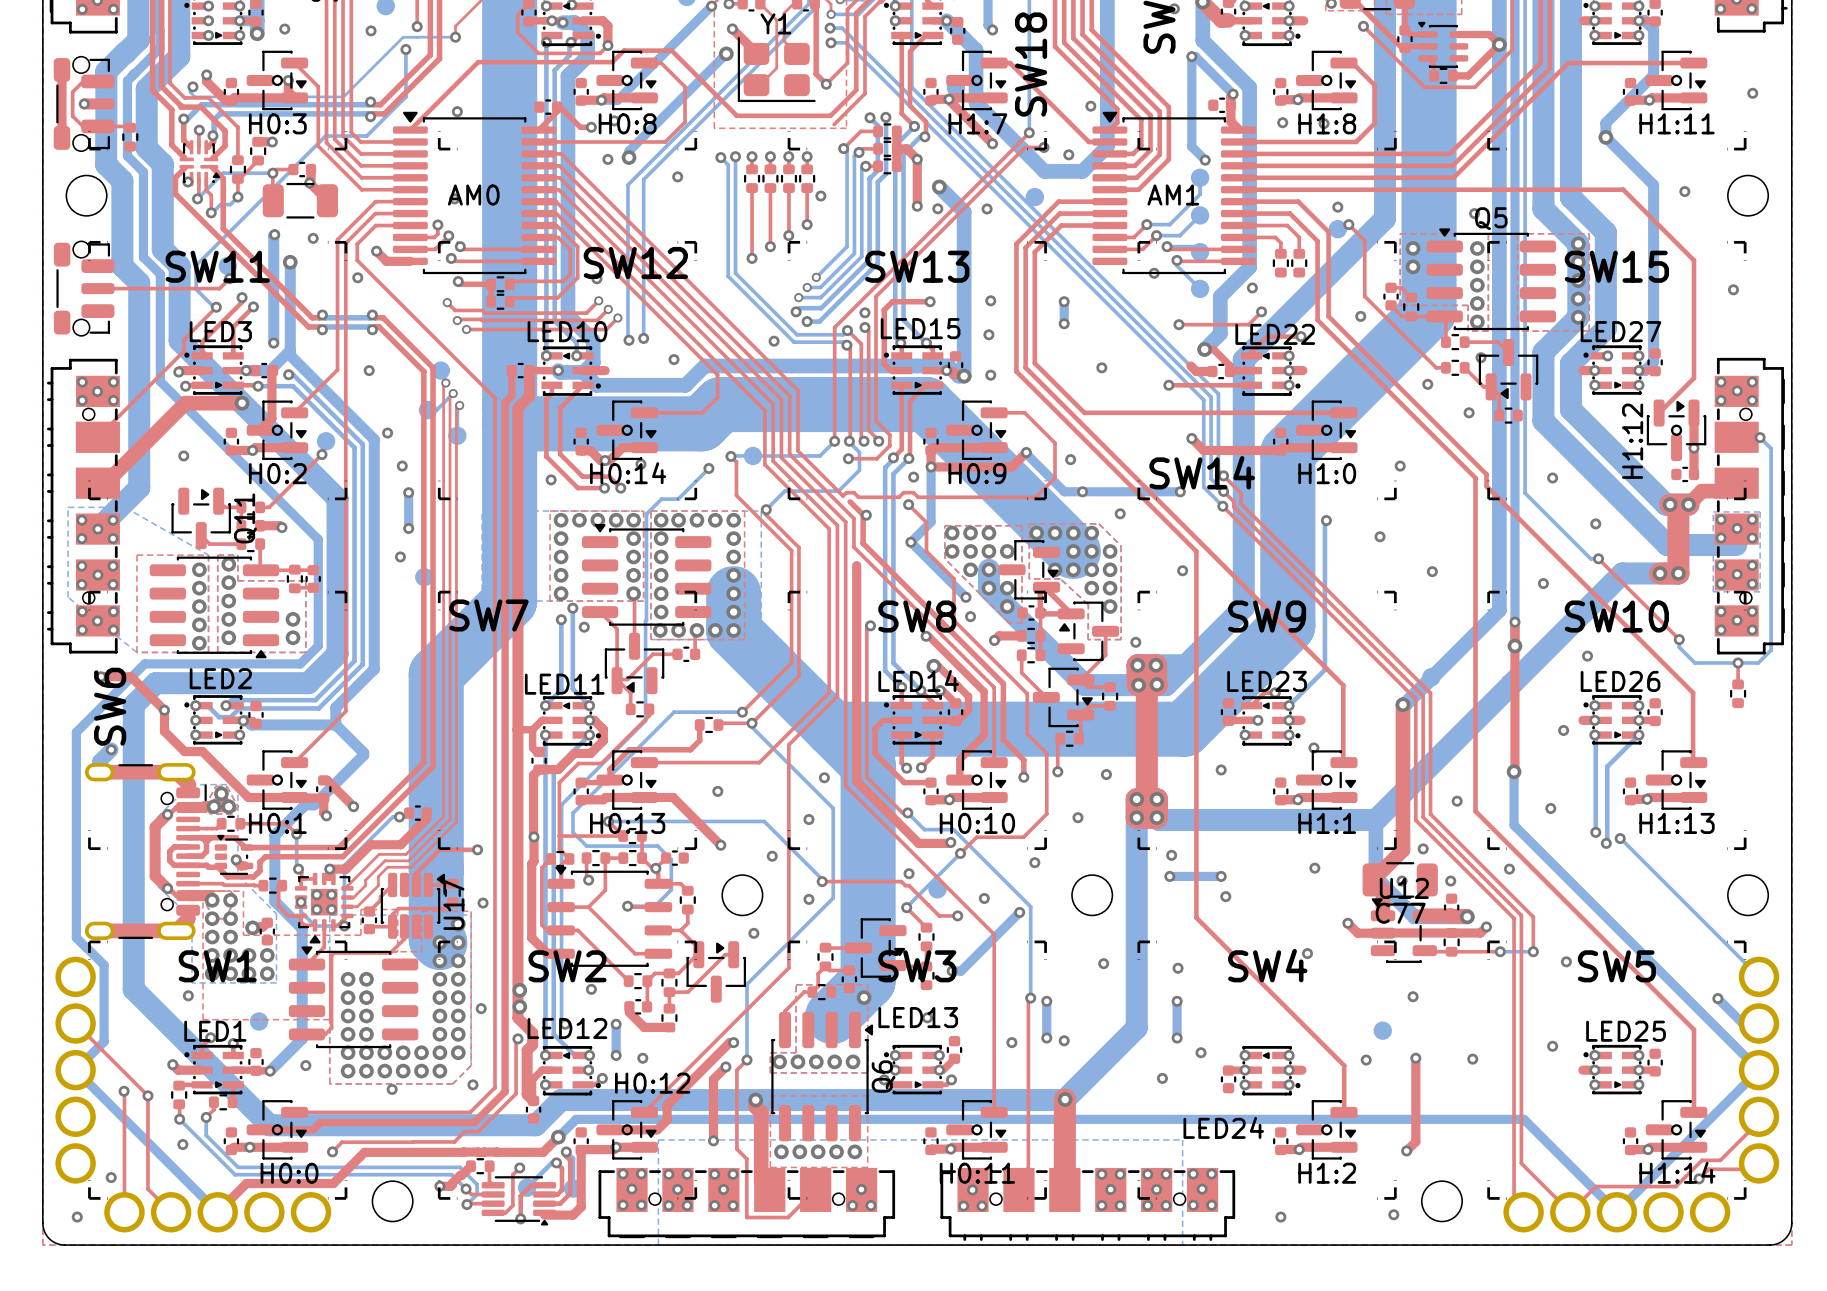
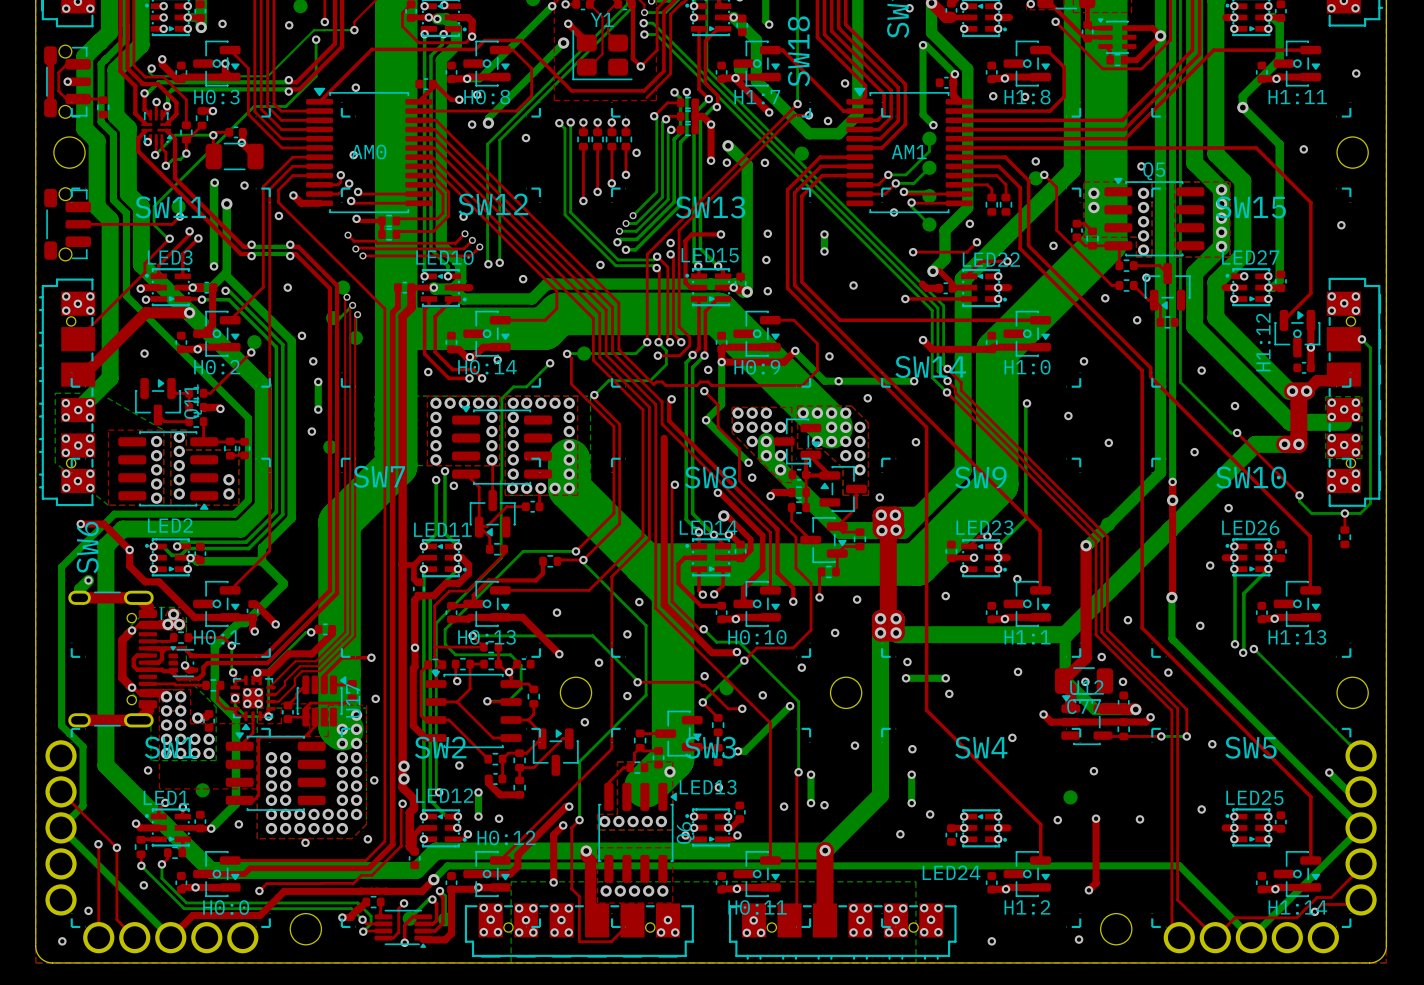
top track: (850, 501) (863, 514) -> none

